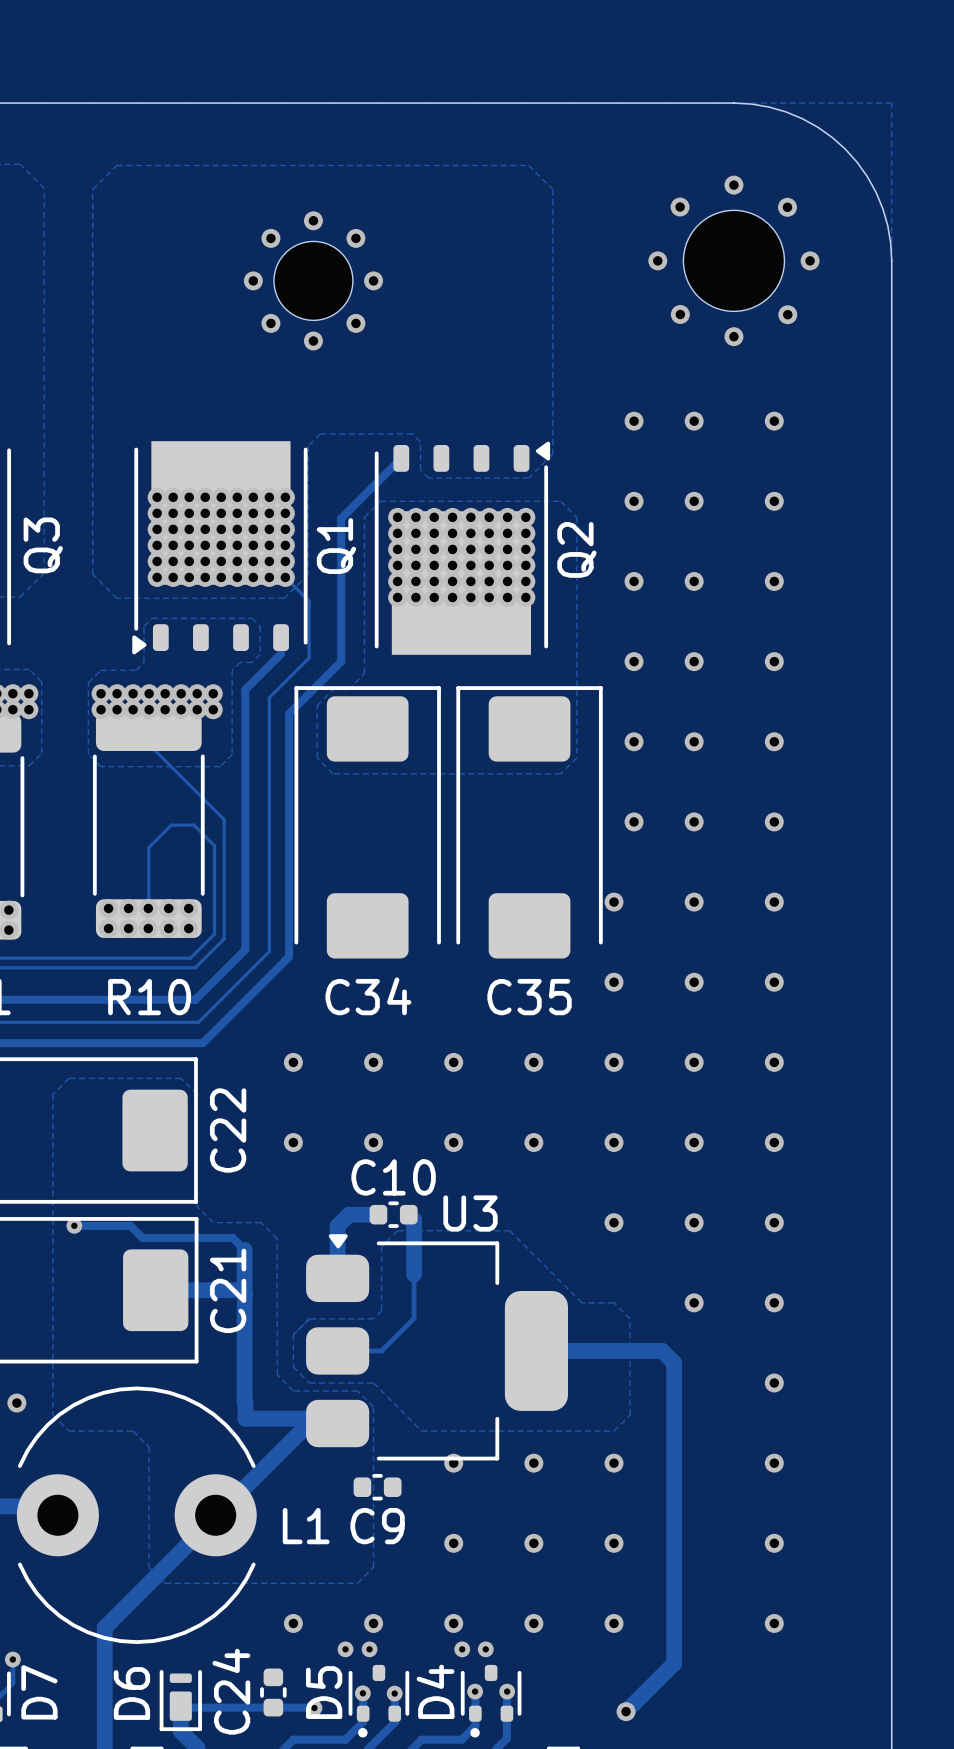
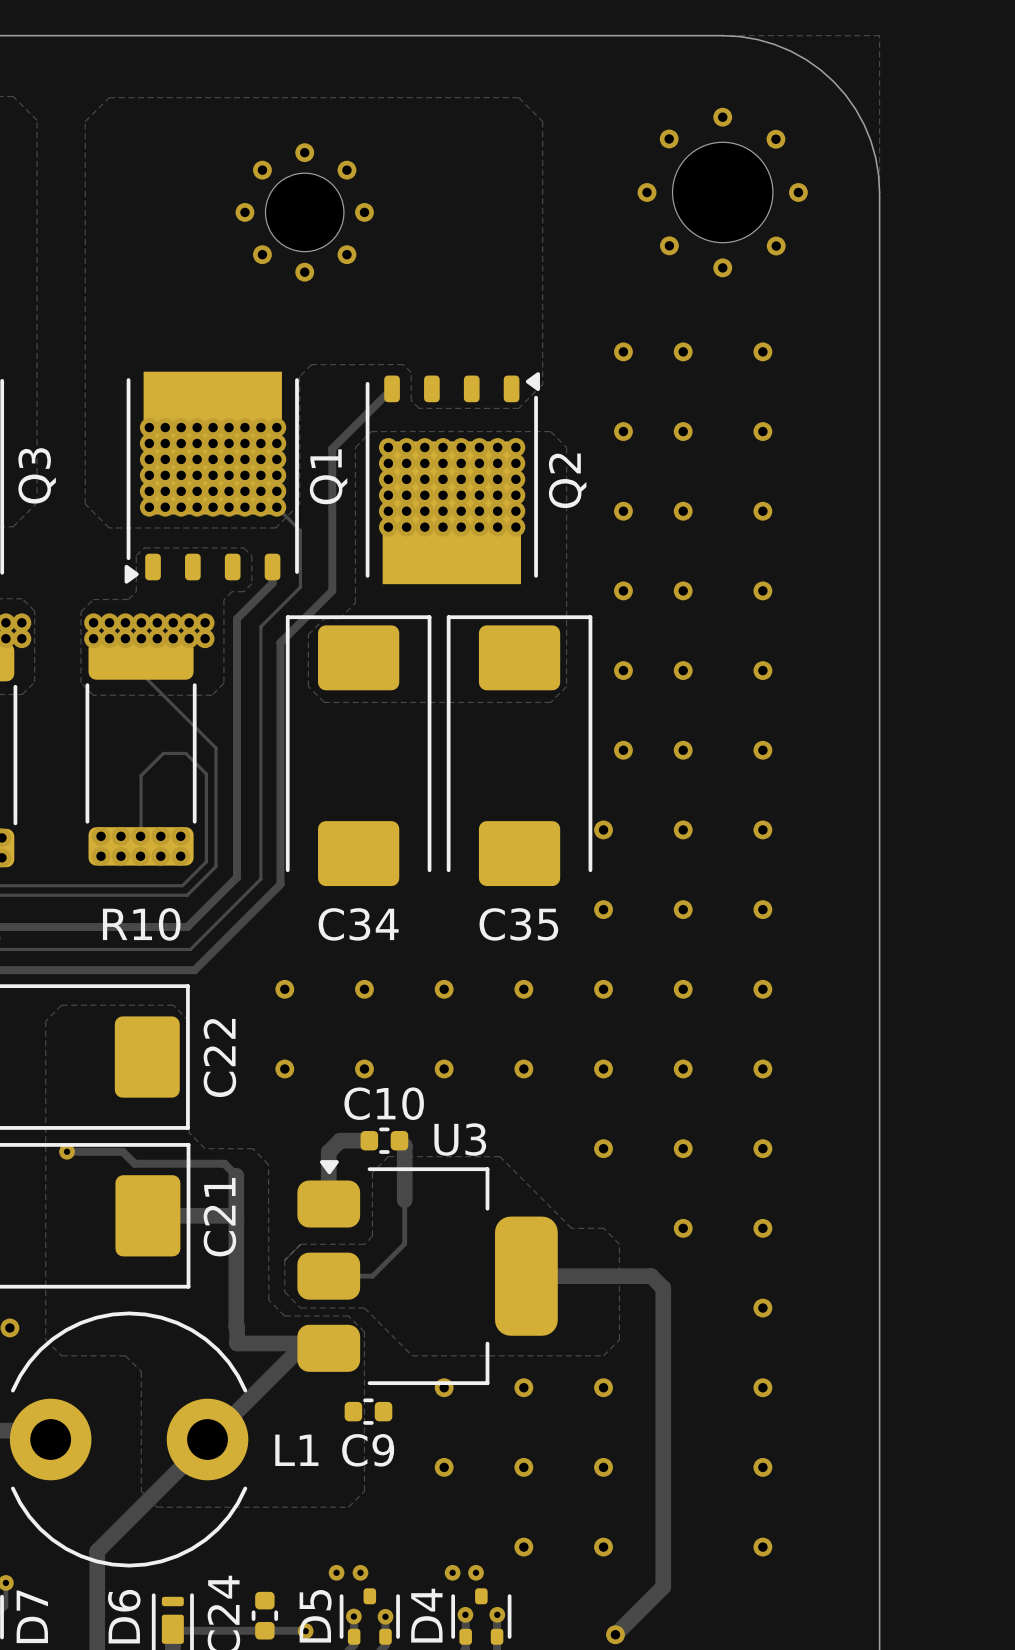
via: (293, 1623) -> none
via: (373, 1623) -> none
via: (453, 1623) -> none

